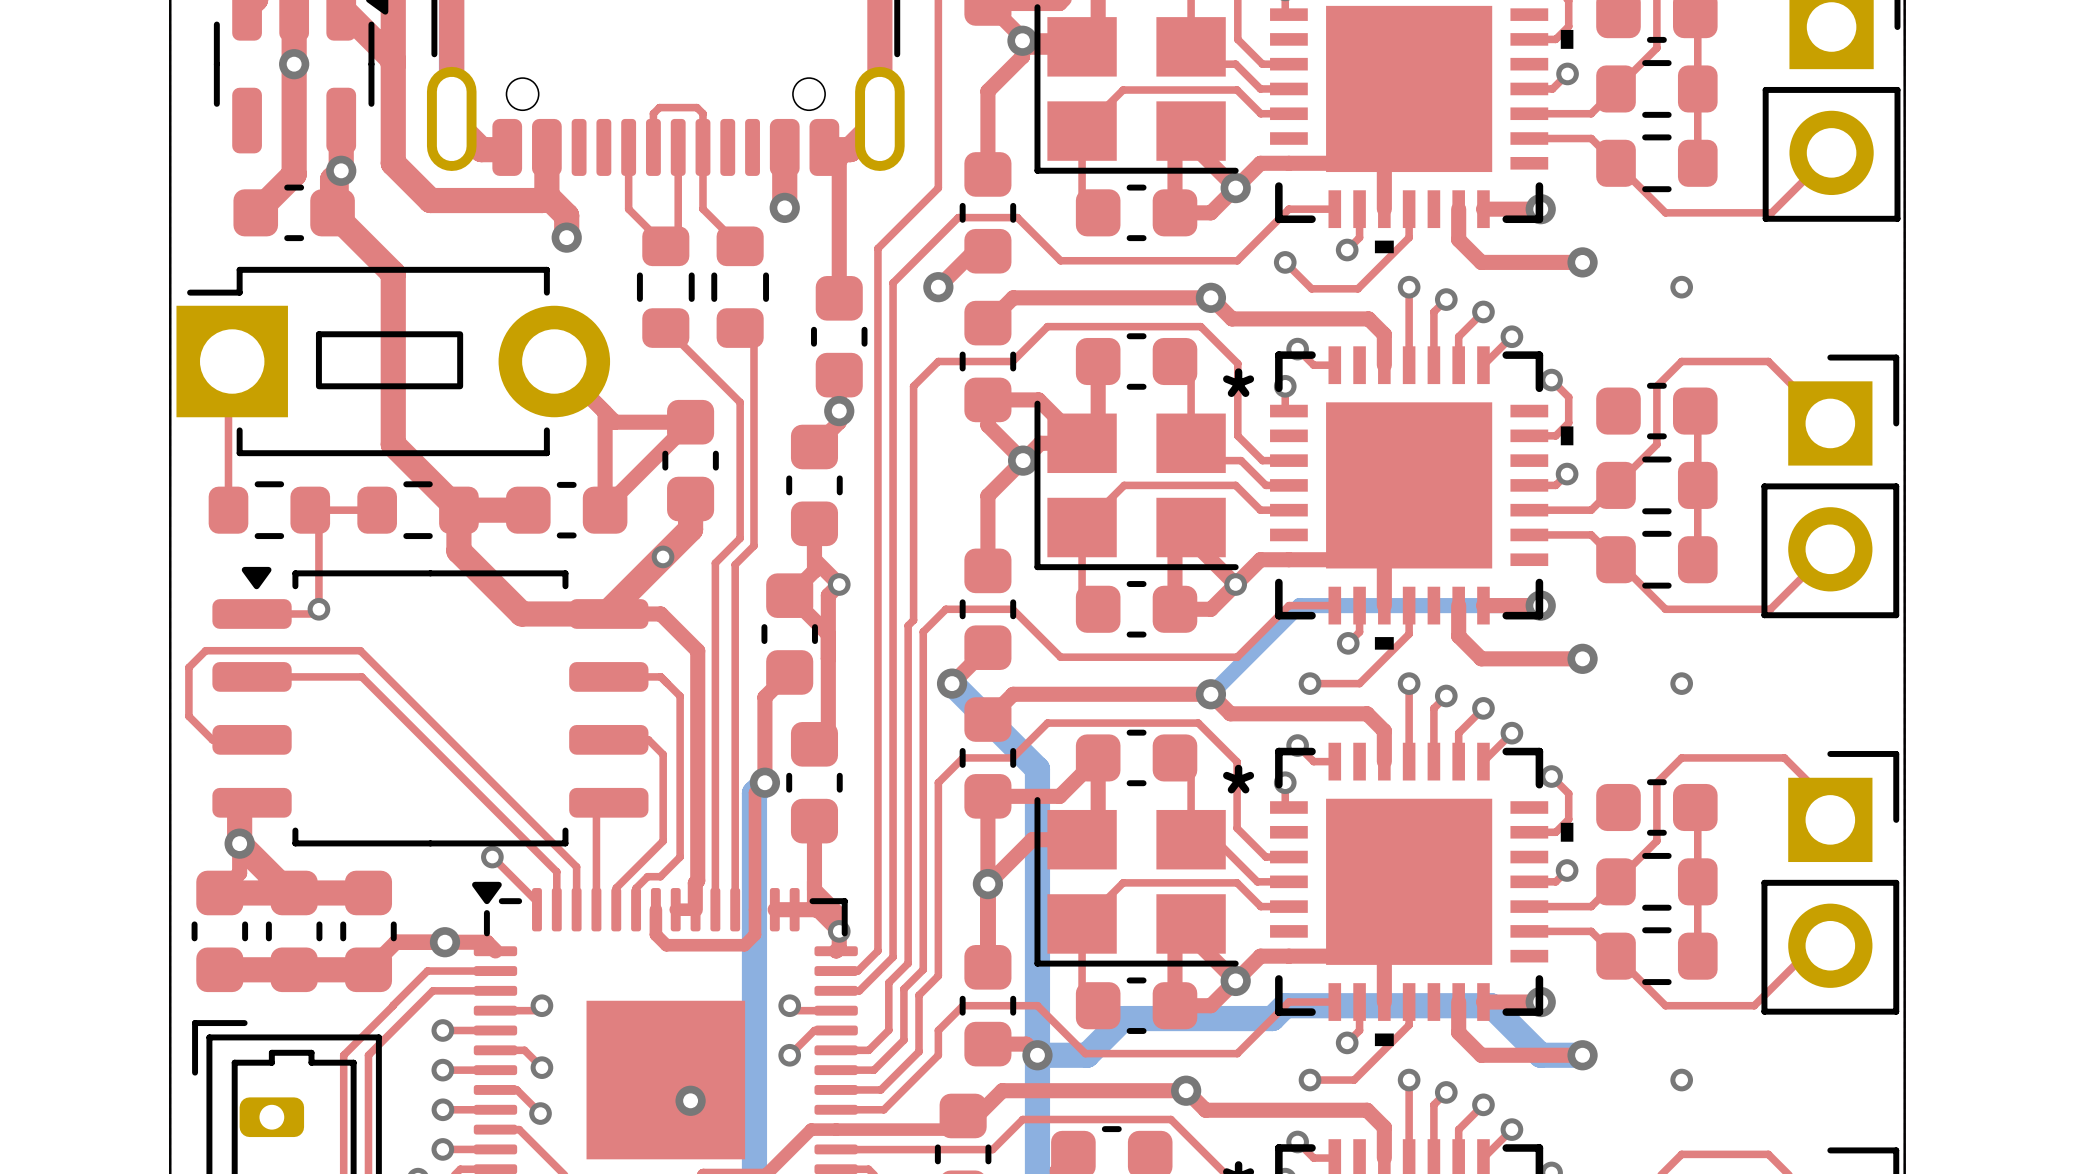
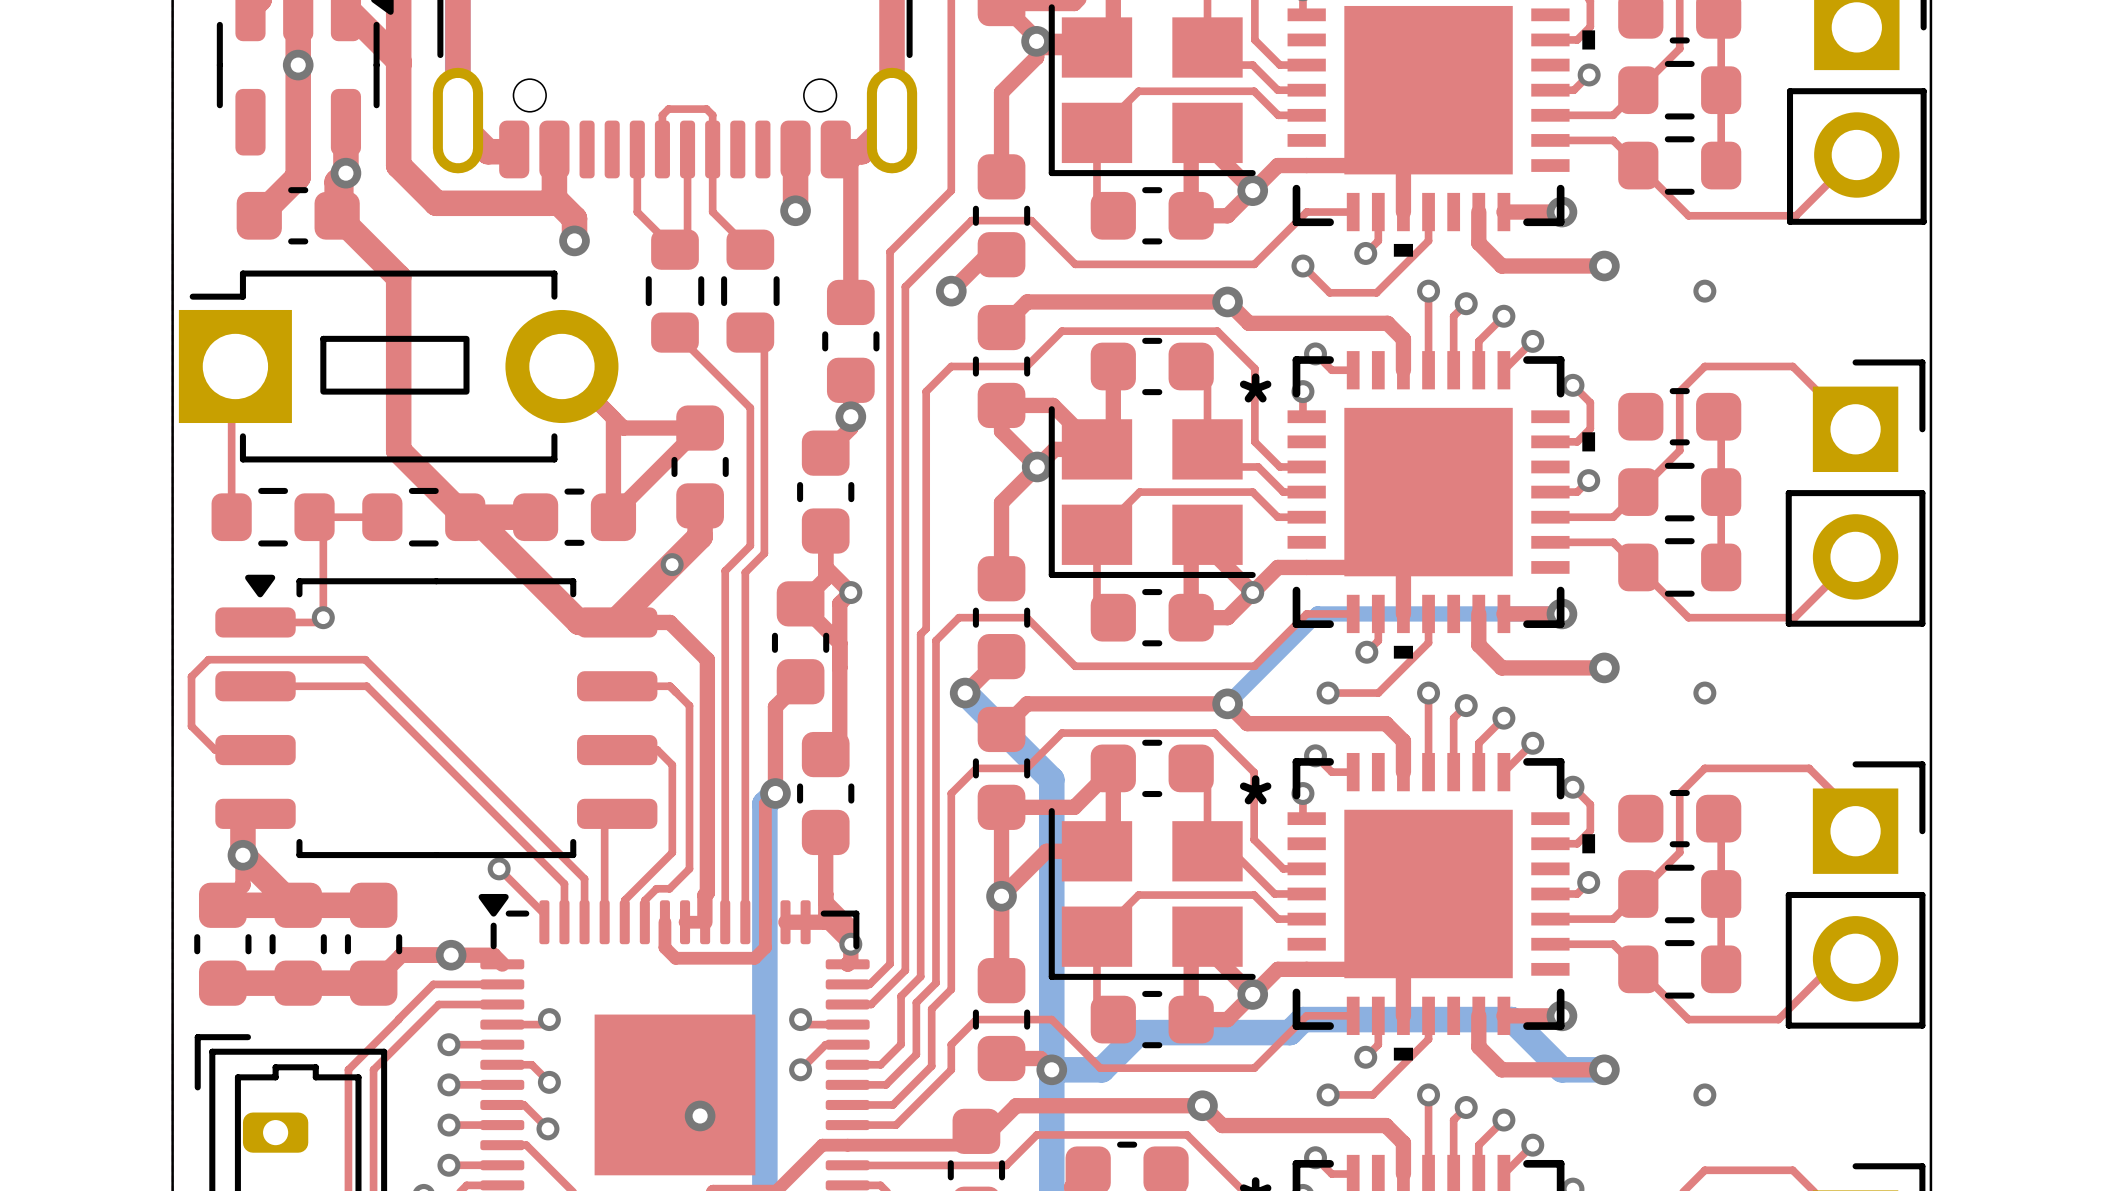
top track: (458, 510) (458, 551) (521, 613) (571, 613) -> (474, 517) (579, 622)

